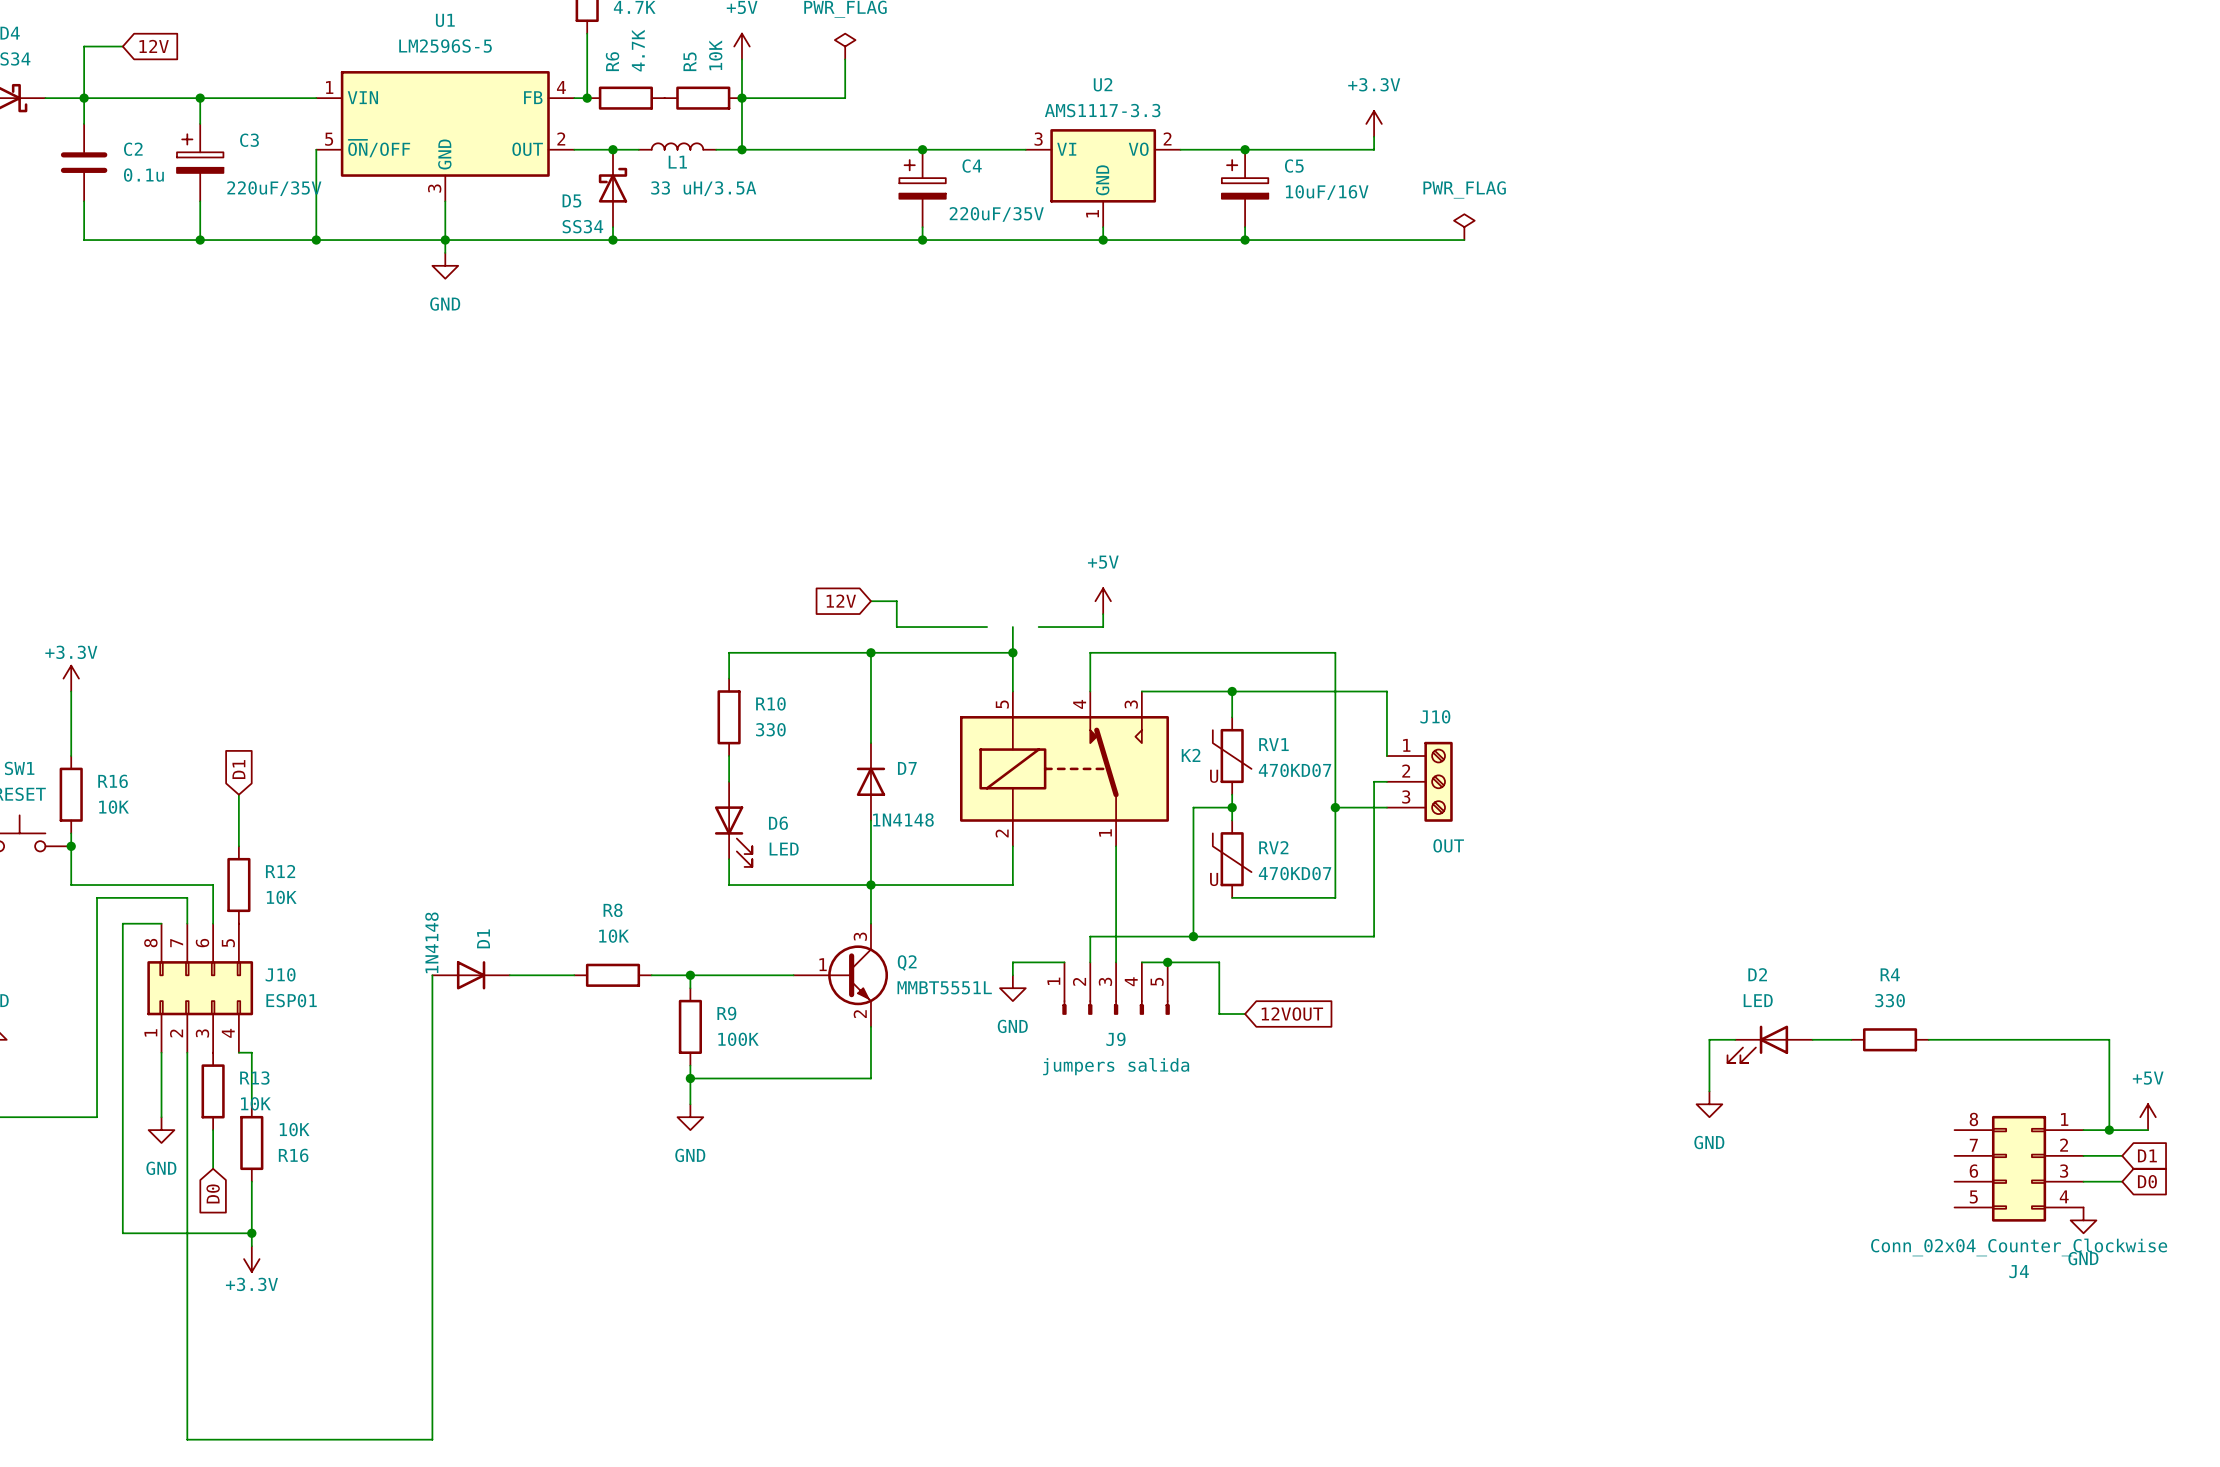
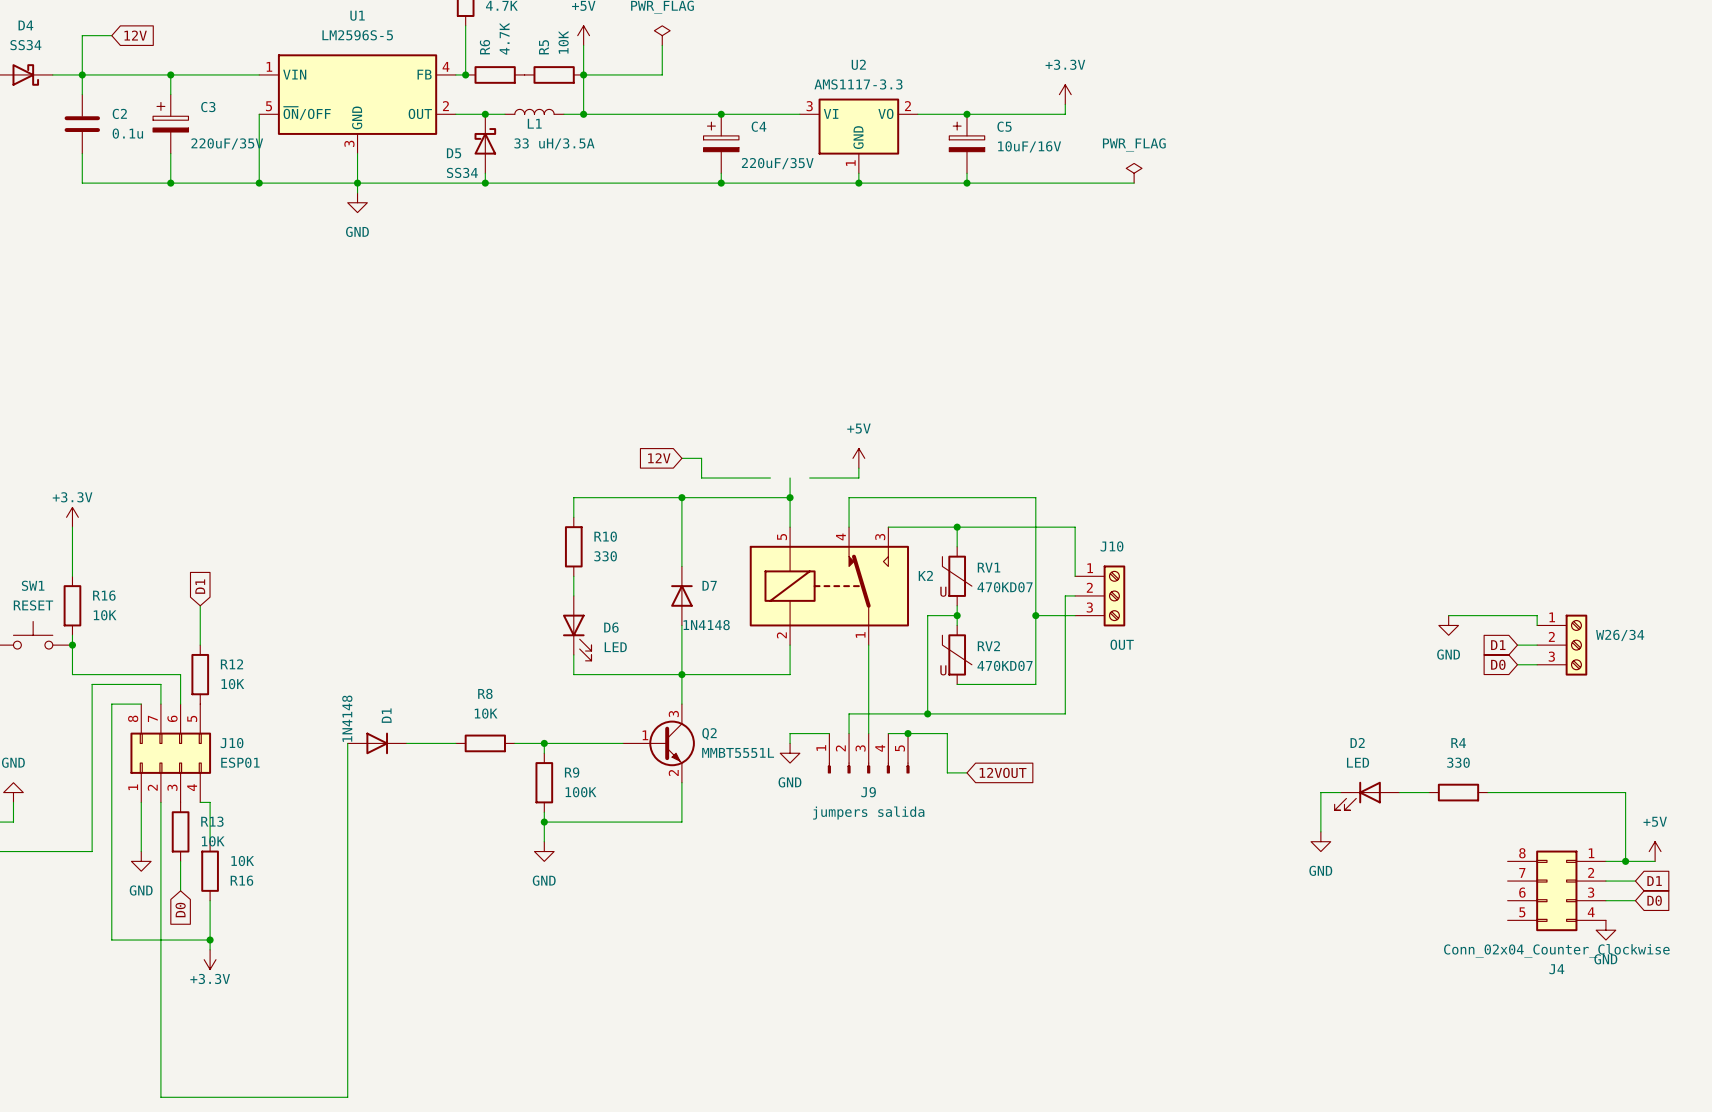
wire: none -> (1448, 615) (1537, 615) (1537, 625)
power symbol: none -> GND (1448, 625)
global label: none -> D1 (1498, 645)
wire: none -> (1517, 645) (1537, 645)
W26/34: none -> (1562, 645)
global label: none -> D0 (1498, 664)
wire: none -> (1517, 664) (1537, 664)

